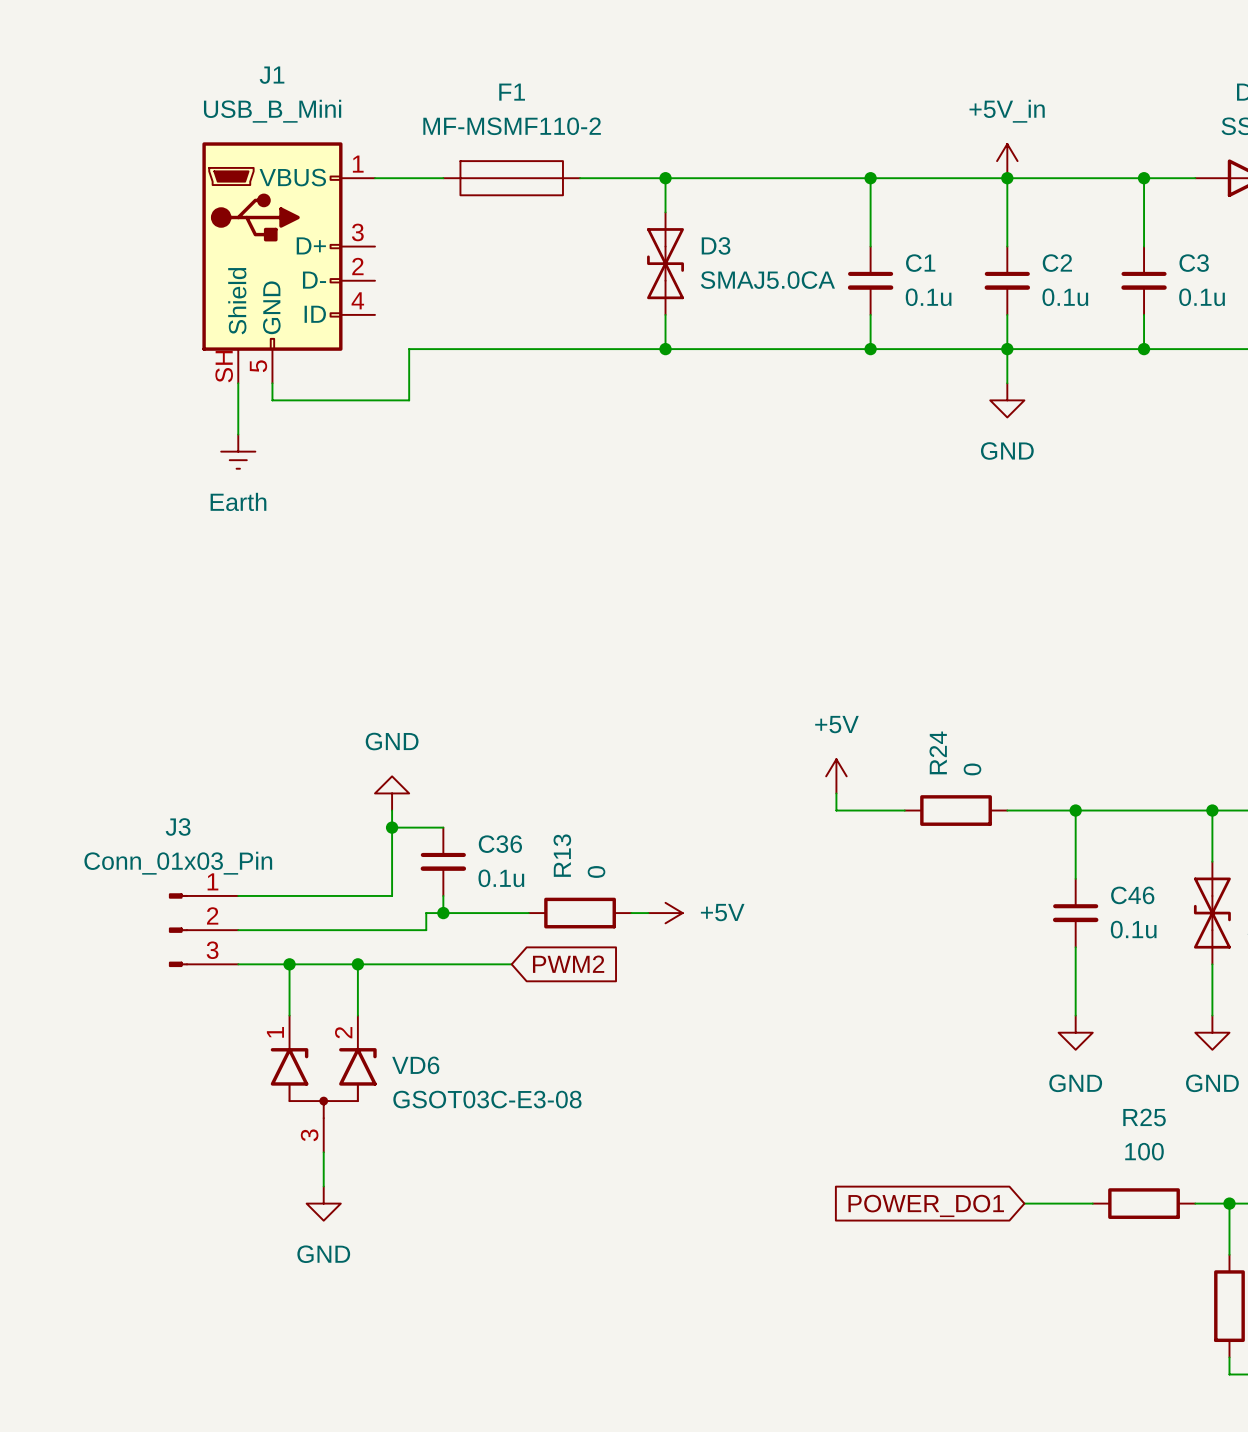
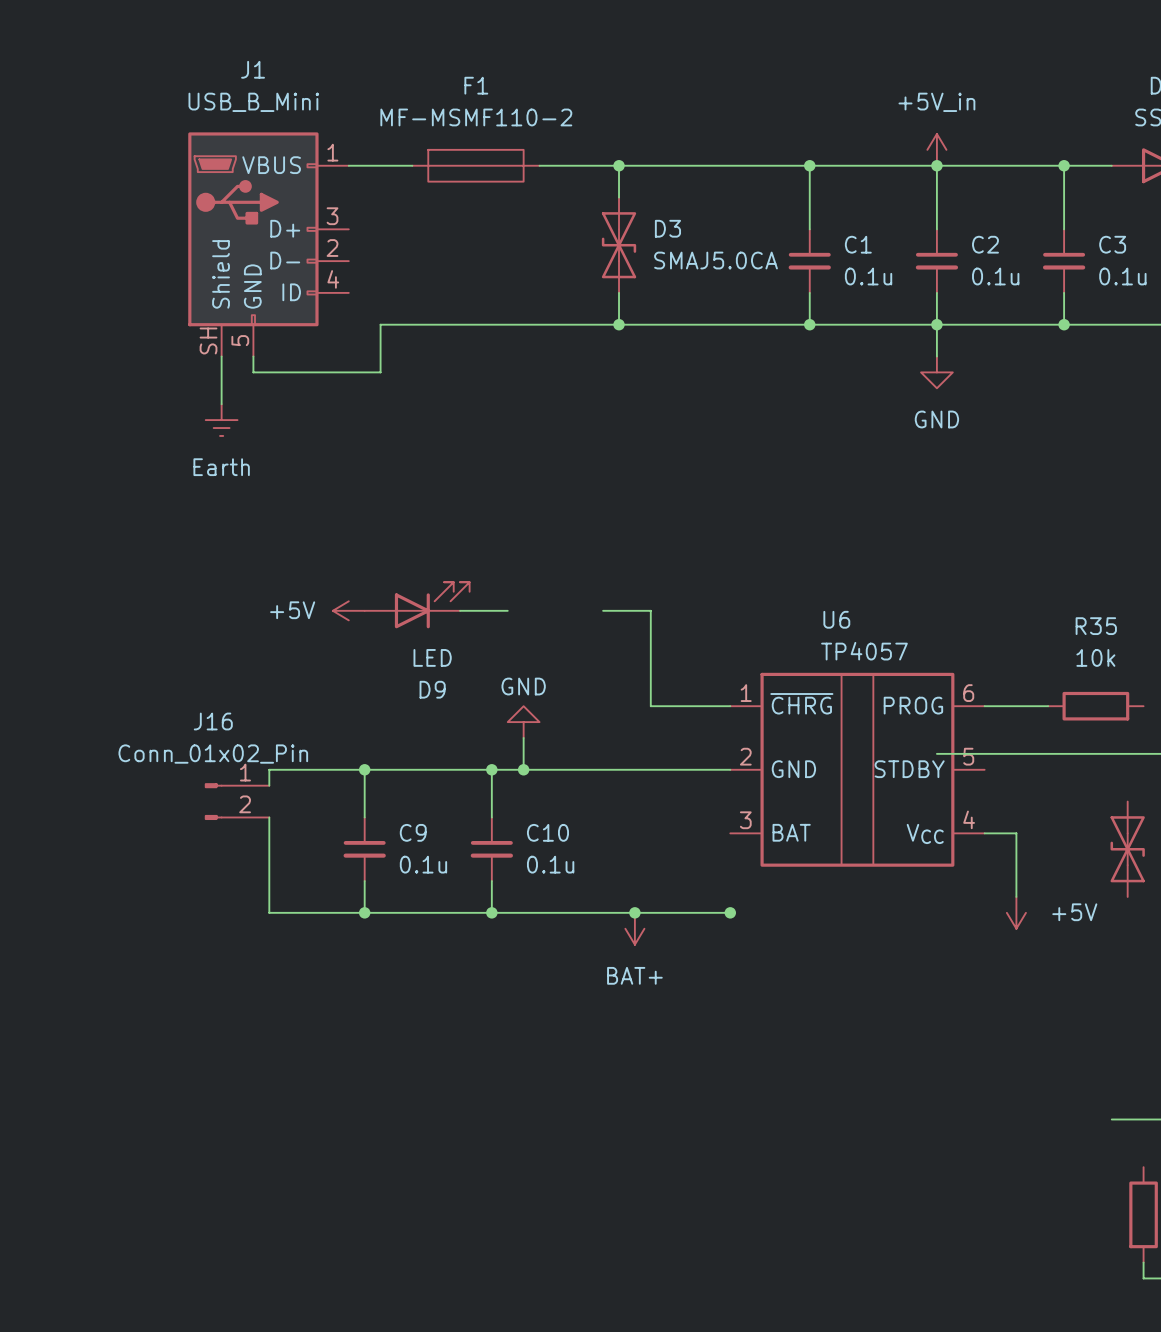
D9: none -> LED (417, 605)
power symbol: none -> +5V (348, 610)
wire: none -> (460, 610) (507, 610)
wire: none -> (603, 610) (650, 610) (650, 706) (730, 706)
power symbol text position: GND (392, 741) -> GND (523, 686)
wire: none -> (984, 706) (1048, 706)
R35: none -> 10k (1095, 706)
power symbol: +5V (836, 776) -> none
power symbol position: GND (392, 793) -> GND (523, 722)
wire: none -> (523, 737) (523, 769)
wire: (836, 793) (836, 810) (904, 810) -> none
wire: (392, 810) (392, 827) -> (269, 785) (269, 769) (364, 769)
R24: 0 (956, 810) -> none
wire: (1075, 810) (1075, 878) -> none
junction: (1075, 810) -> none
wire: (1212, 810) (1212, 861) -> none
junction: (1212, 810) -> none
wire: none -> (412, 769) (730, 769)
junction: none -> (491, 769)
junction: none -> (523, 769)
U6: none -> TP4057 (857, 769)
J16: none -> Conn_01x02_Pin (237, 801)
C36: 0.1u (443, 861) -> none
wire: none -> (269, 817) (269, 896)
wire: (392, 878) (392, 895) (238, 895) -> none
wire: (443, 895) (443, 913) -> none
wire: none -> (984, 833) (1016, 833) (1016, 896)
C9: none -> 0.1u (364, 849)
junction: (443, 913) -> none
wire: (528, 913) (426, 913) (426, 930) (238, 930) -> none
C10: none -> 0.1u (491, 849)
R13: 0 (580, 913) -> none
wire: (631, 913) (648, 913) -> none
power symbol: +5V (665, 913) -> none
C46: 0.1u (1075, 913) -> none
J3: Conn_01x03_Pin (203, 930) -> none
wire: none -> (491, 881) (491, 912)
wire: (1075, 947) (1075, 1015) -> none
wire: (238, 964) (511, 964) -> none
junction: (289, 964) -> none
wire: (357, 964) (357, 1015) -> (491, 769) (491, 817)
junction position: (357, 964) -> (364, 912)
global label: PWM2 (568, 964) -> none
wire: (1212, 964) (1212, 1015) -> none
wire: (289, 981) (289, 1015) -> (269, 912) (730, 912)
junction: none -> (491, 912)
junction: none -> (634, 912)
junction: none -> (730, 912)
power symbol: none -> +5V (1016, 912)
power symbol: none -> BAT+ (634, 928)
power symbol: GND (1075, 1032) -> none
power symbol: GND (1212, 1032) -> none
VD6: GSOT03C-E3-08 (323, 1083) -> none
wire: (323, 1152) (323, 1186) -> (364, 881) (364, 912)
power symbol: GND (323, 1203) -> none
wire: (1024, 1203) (1092, 1203) -> none
R25: 100 (1144, 1203) -> none
wire: (1229, 1203) (1229, 1254) -> none
junction: (1229, 1203) -> none
global label: POWER_DO1 (926, 1205) -> none

